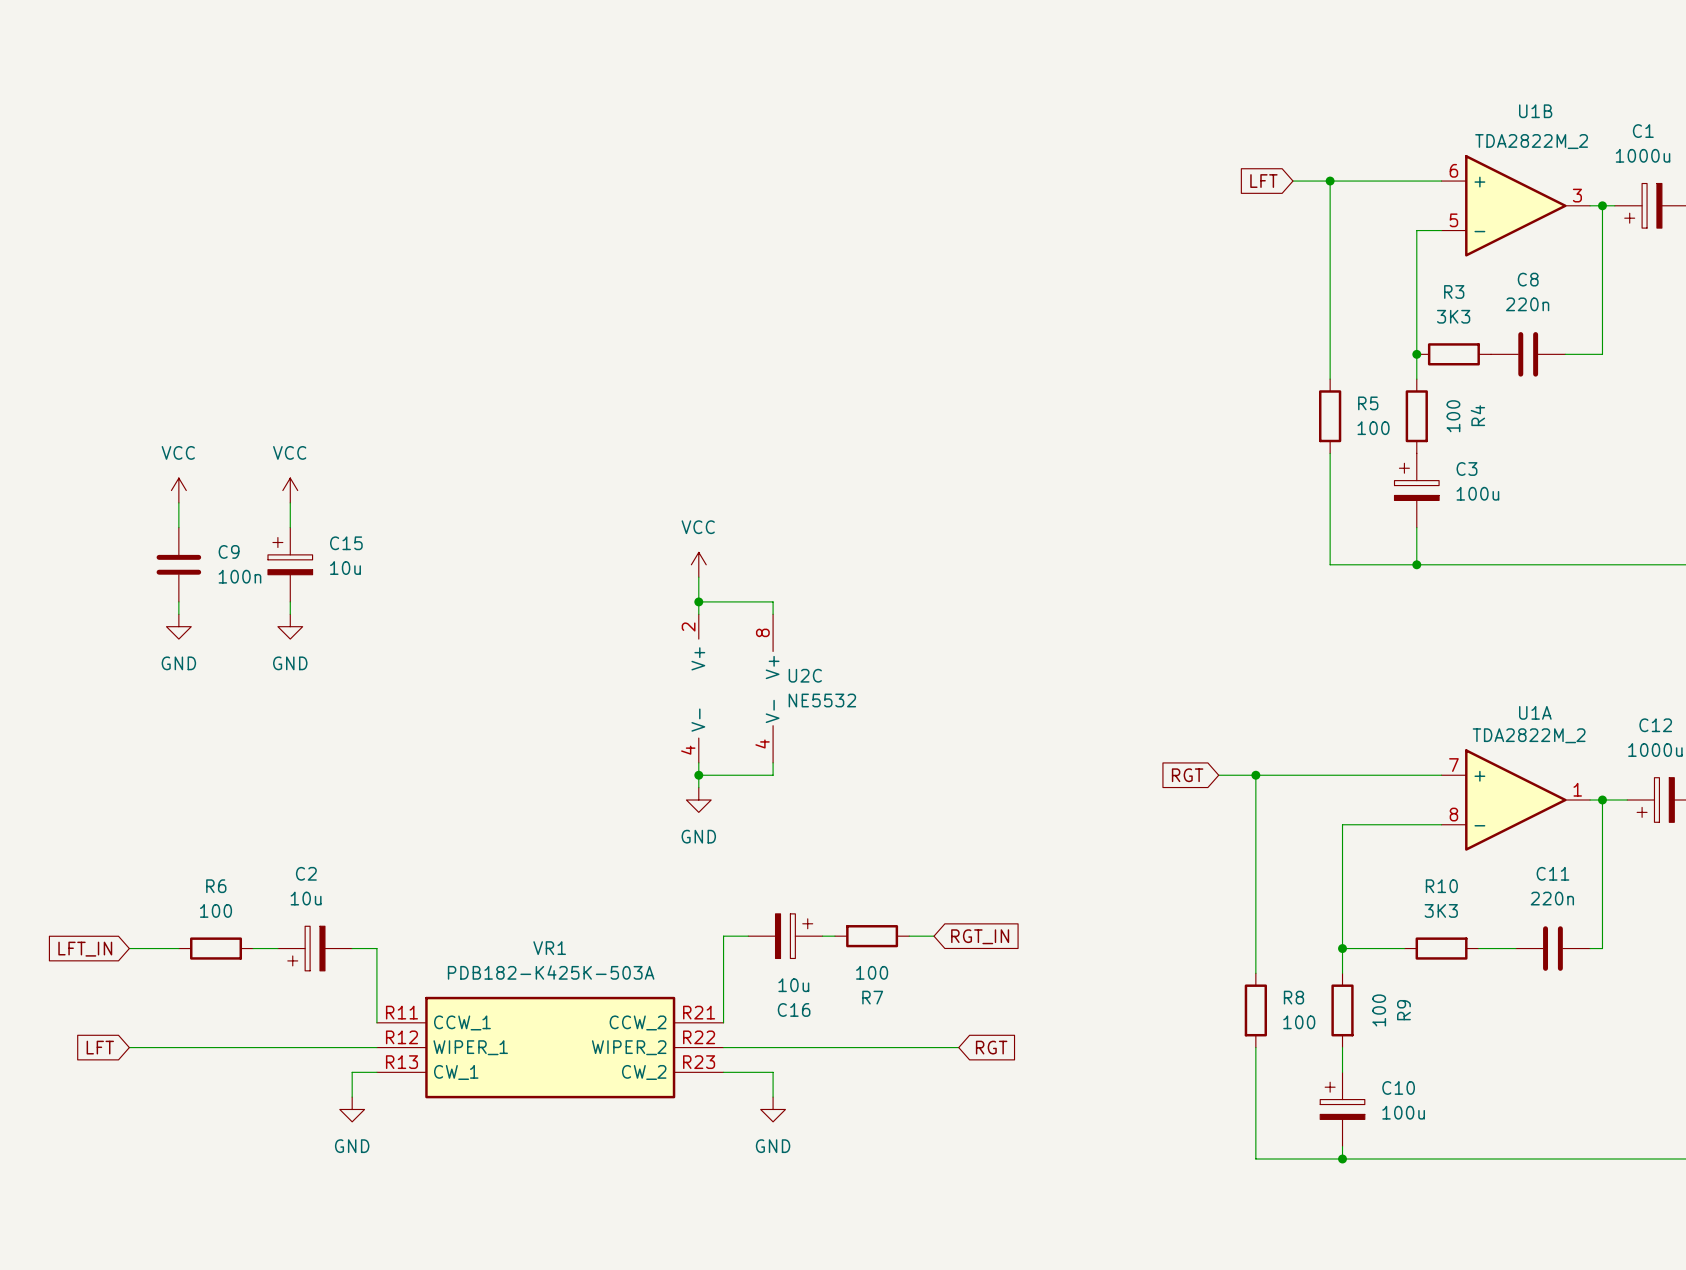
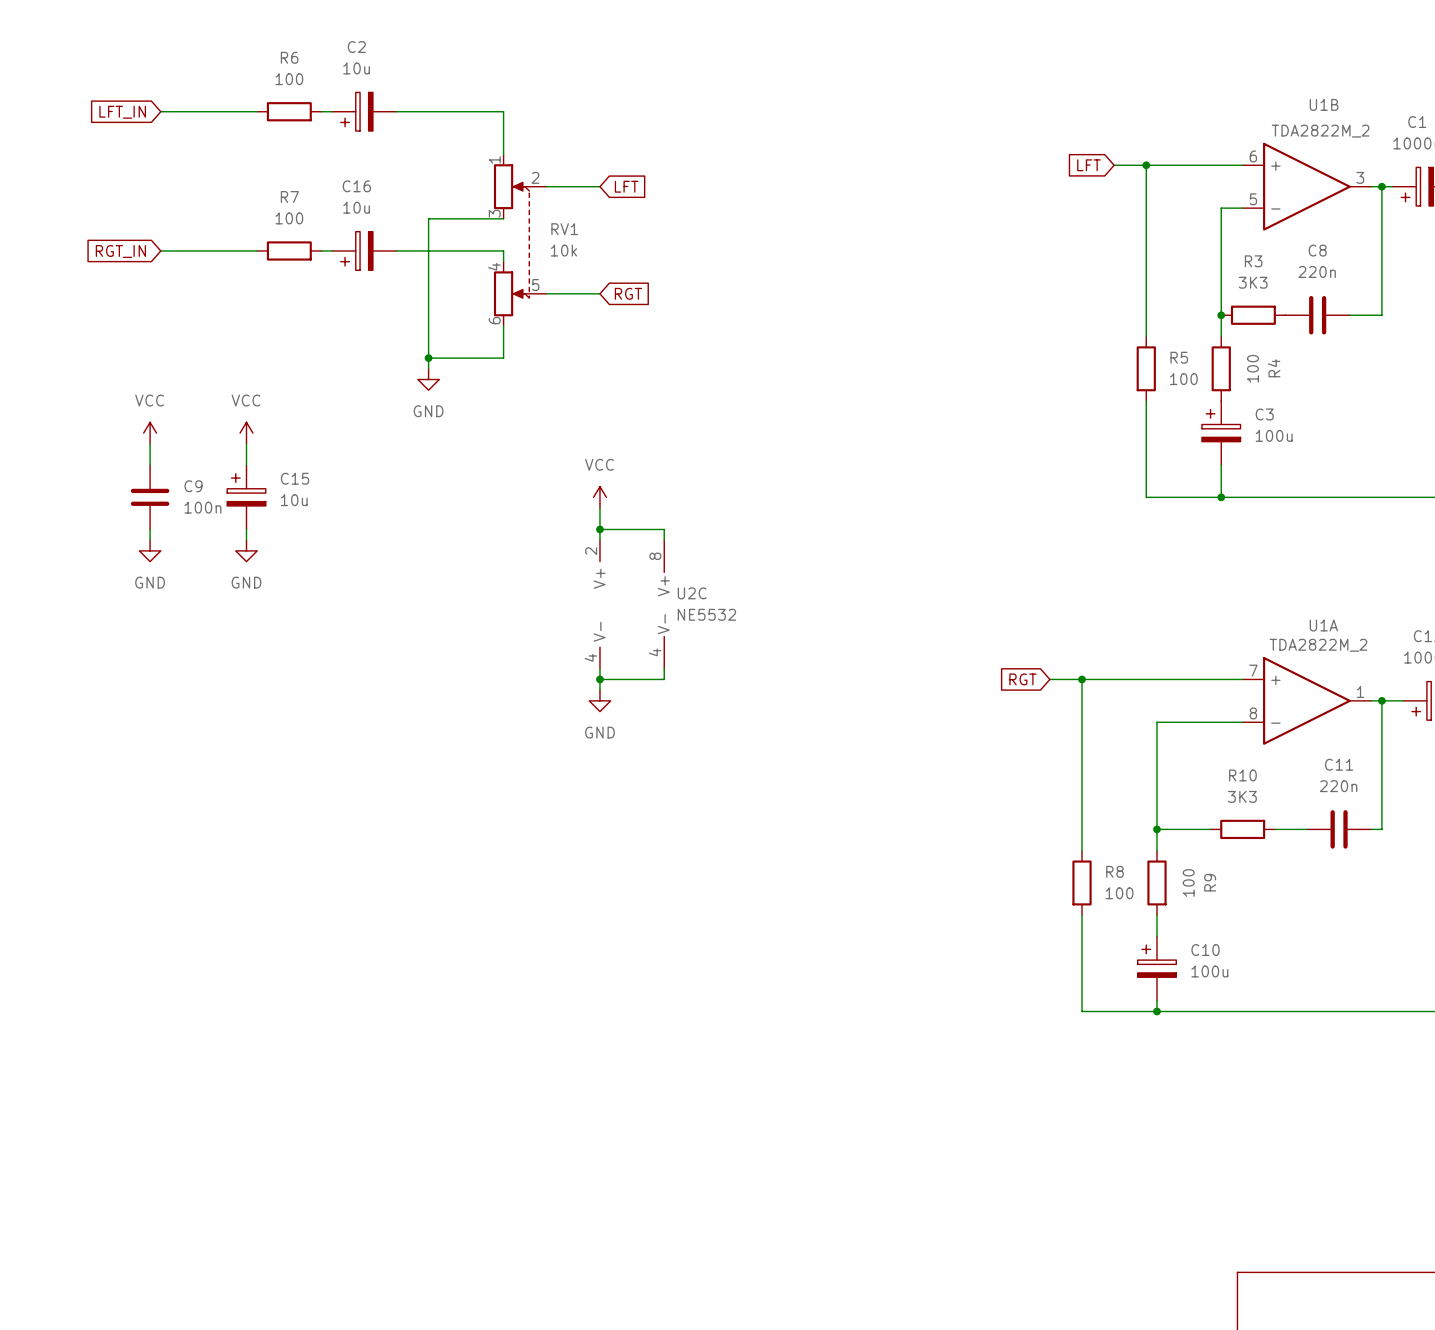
global label: none -> LFT_IN (122, 112)
wire: none -> (160, 111) (257, 111)
wire: none -> (321, 111) (332, 111)
wire: none -> (396, 111) (503, 111) (503, 154)
wire: none -> (546, 186) (599, 186)
global label: none -> LFT (626, 186)
wire: none -> (503, 218) (428, 218) (428, 368)
RV1: none -> 10k (520, 240)
global label: none -> RGT_IN (120, 251)
wire: none -> (160, 250) (257, 250)
wire: none -> (321, 250) (332, 250)
wire: none -> (396, 250) (503, 250) (503, 261)
wire: none -> (546, 293) (599, 293)
global label: none -> RGT (628, 293)
wire: none -> (503, 325) (503, 358) (428, 358)
junction: none -> (428, 358)
power symbol: none -> GND (428, 379)
wire: (748, 936) (723, 936) (723, 1022) -> none
C16 position: (785, 936) -> (364, 250)
C16 rotation: 0° (794, 936) -> 180° (356, 250)
wire: (822, 936) (834, 936) -> none
R7 position: (872, 936) -> (289, 250)
wire: (909, 936) (934, 936) -> none
global label: RGT_IN (980, 936) -> none
wire: (129, 948) (178, 948) -> none
R6 position: (216, 948) -> (289, 111)
wire: (253, 948) (277, 948) -> none
C2 position: (315, 948) -> (364, 111)
wire: (352, 948) (376, 948) (376, 1022) -> none
global label: LFT_IN (85, 949) -> none
R7 value position: 100 (872, 972) -> 100 (289, 218)
R7 name position: R7 (872, 997) -> R7 (289, 197)
global label: LFT (100, 1047) -> none
wire: (129, 1047) (376, 1047) -> none
VR1: PDB182-K425K-503A (550, 1047) -> none
wire: (723, 1047) (958, 1047) -> none
global label: RGT (991, 1047) -> none
wire: (376, 1072) (352, 1072) (352, 1097) -> none
wire: (723, 1072) (773, 1072) (773, 1097) -> none
power symbol: GND (352, 1109) -> none
power symbol: GND (773, 1109) -> none

